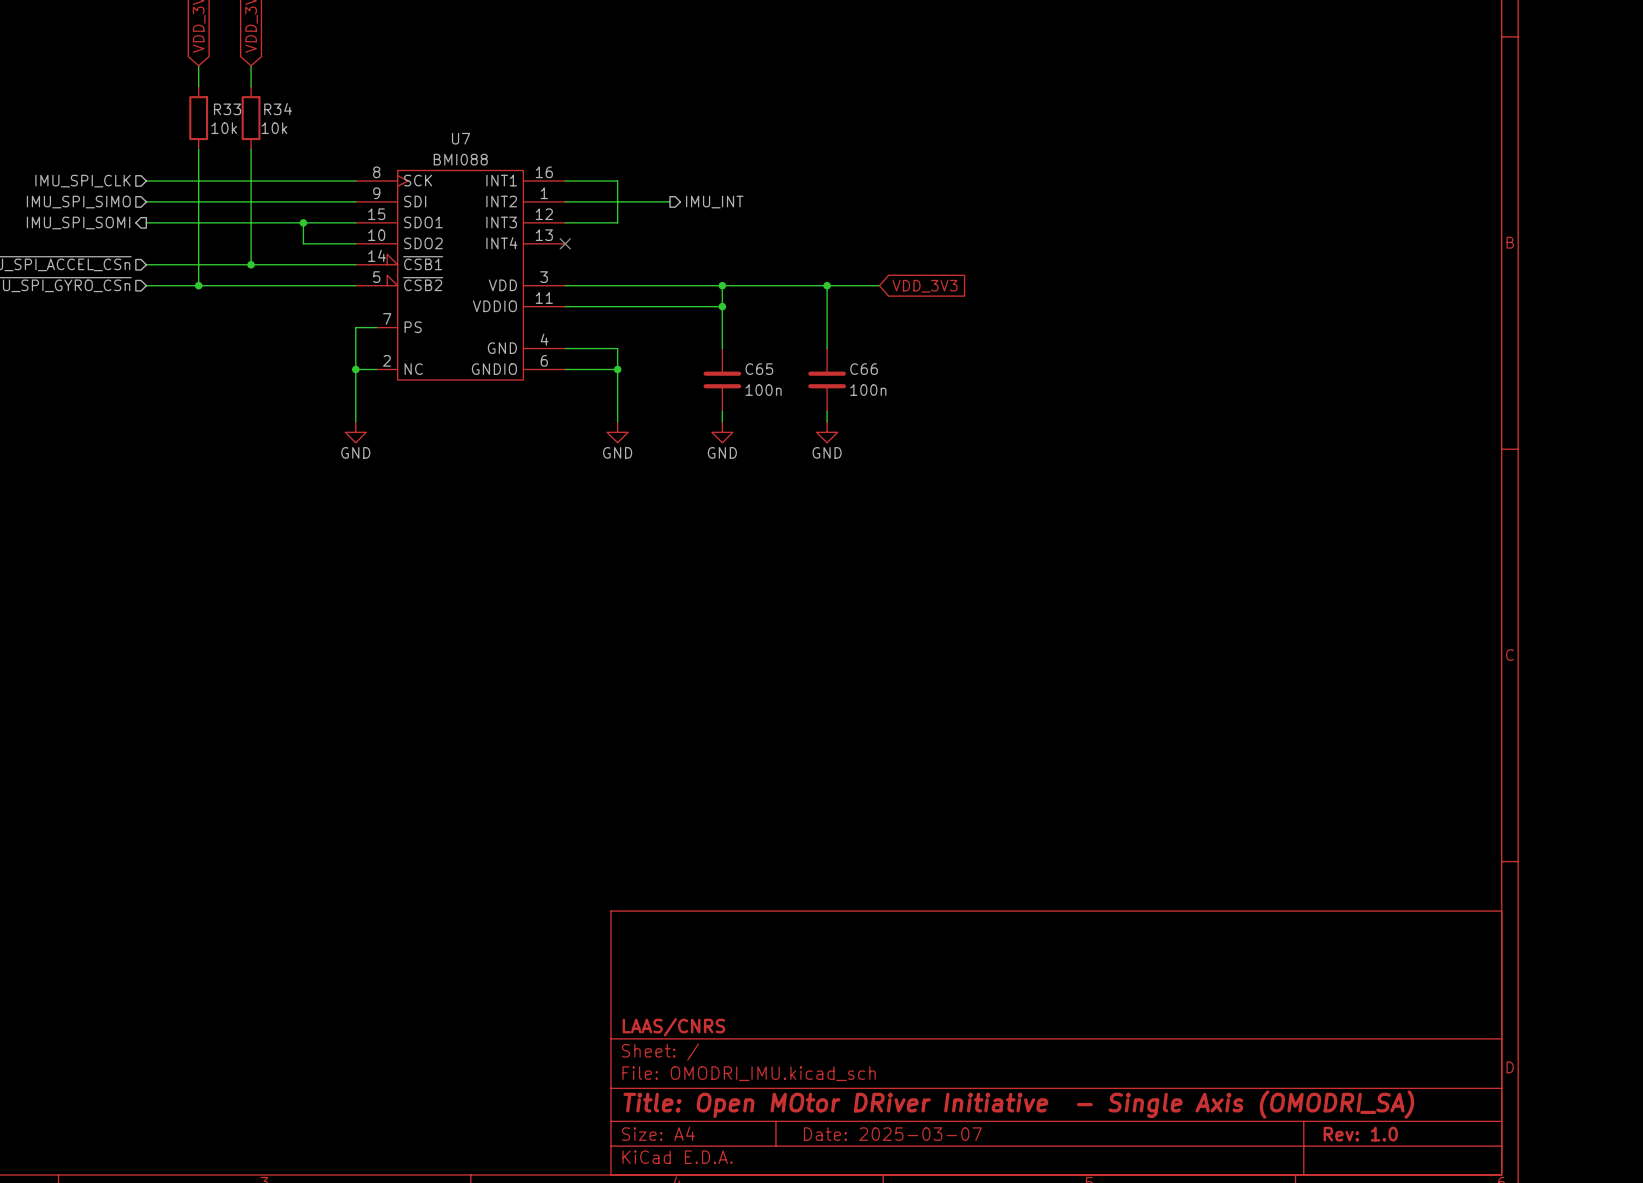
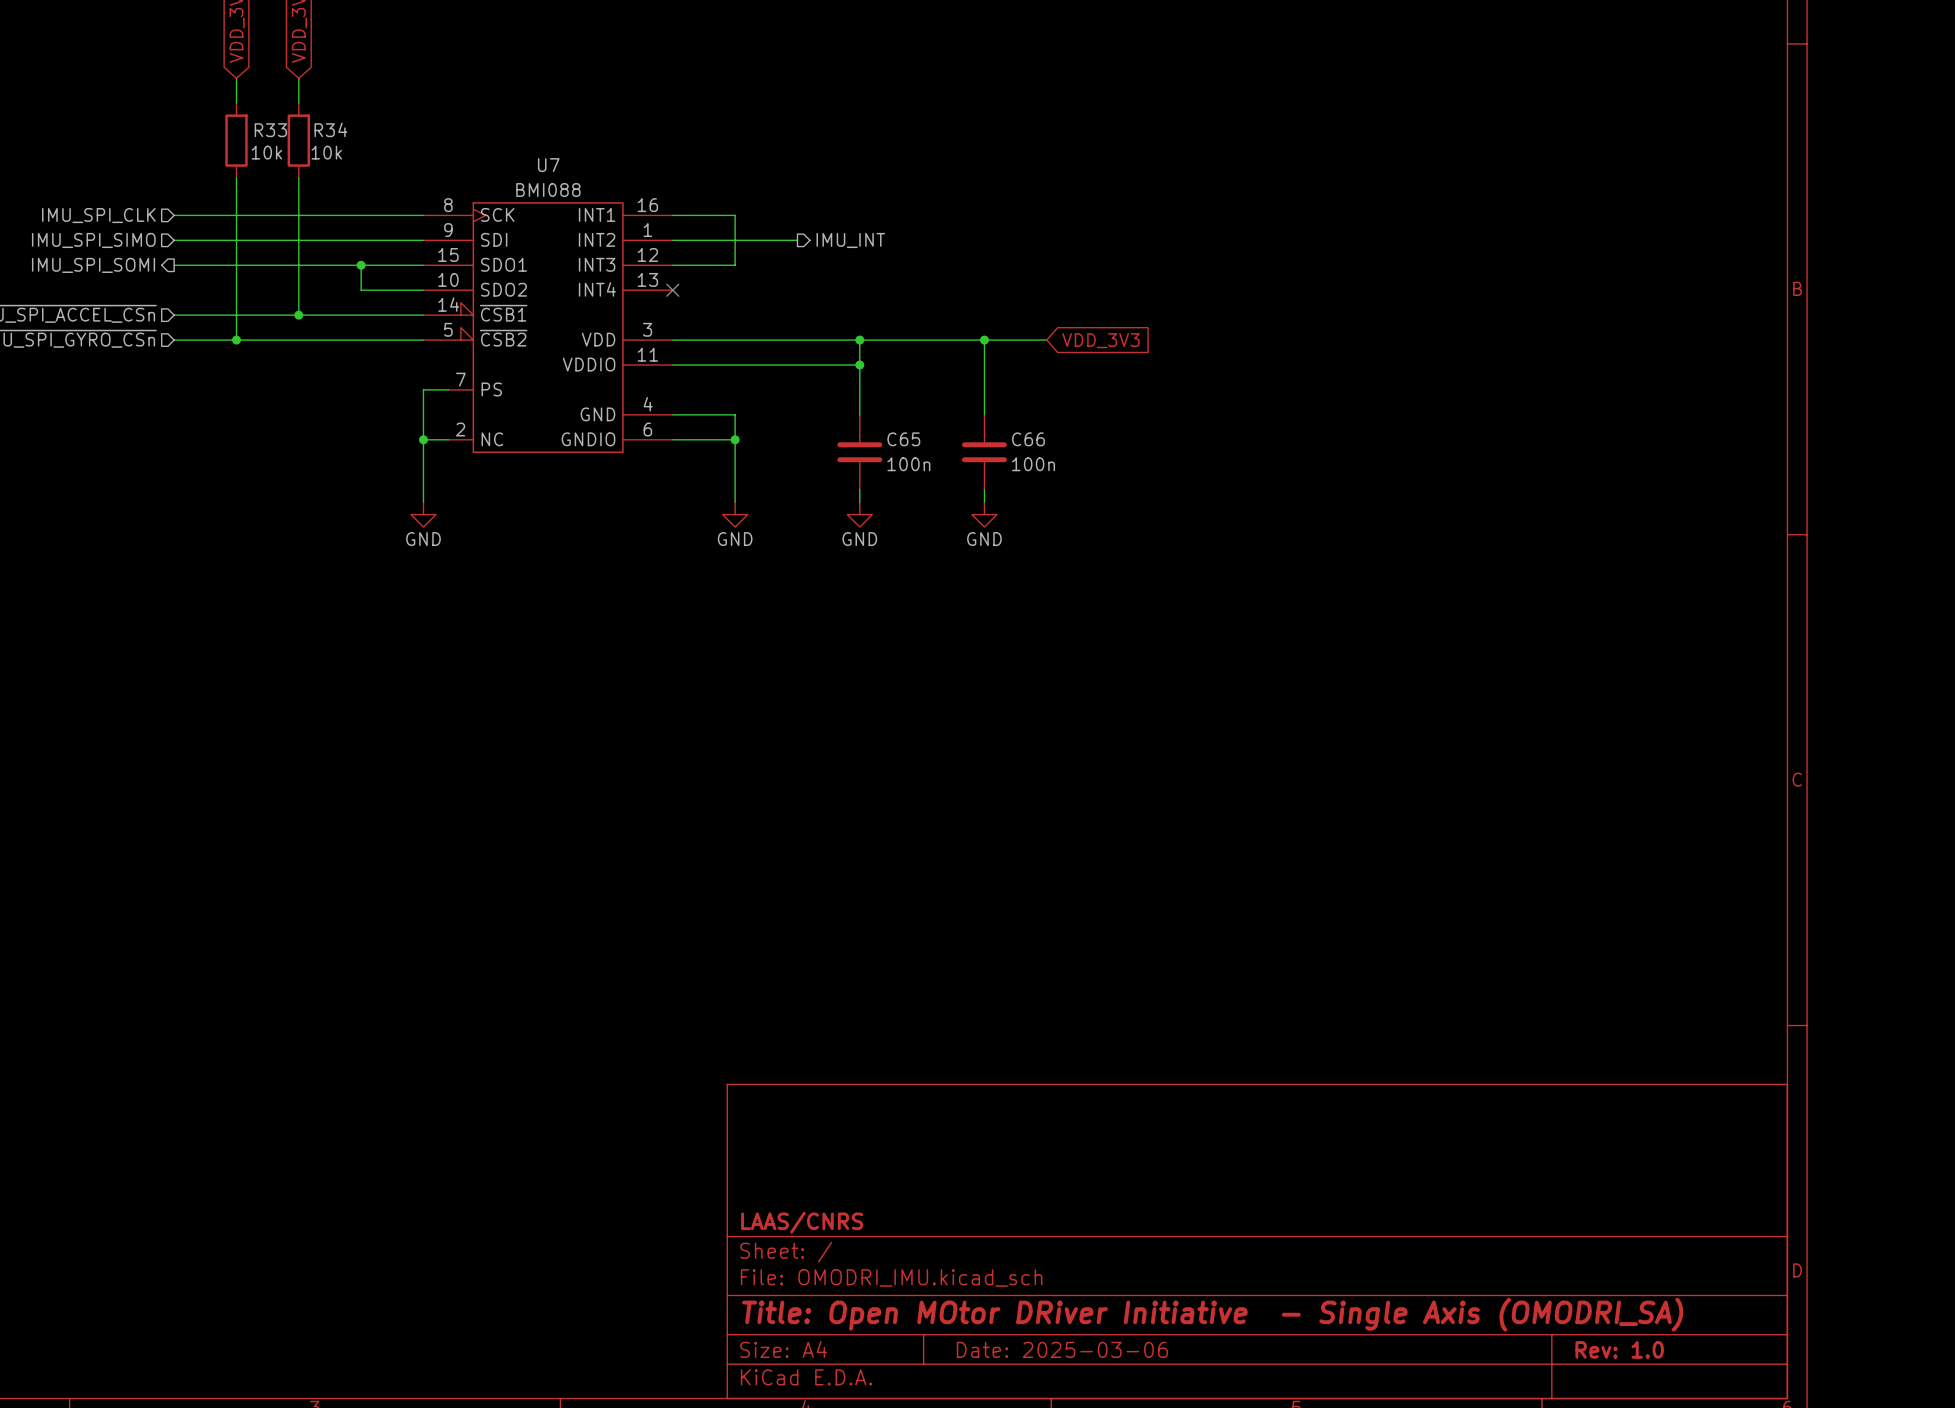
title block: Date: 2025-03-07 (892, 1134) -> Date: 2025-03-06 (1062, 1349)

